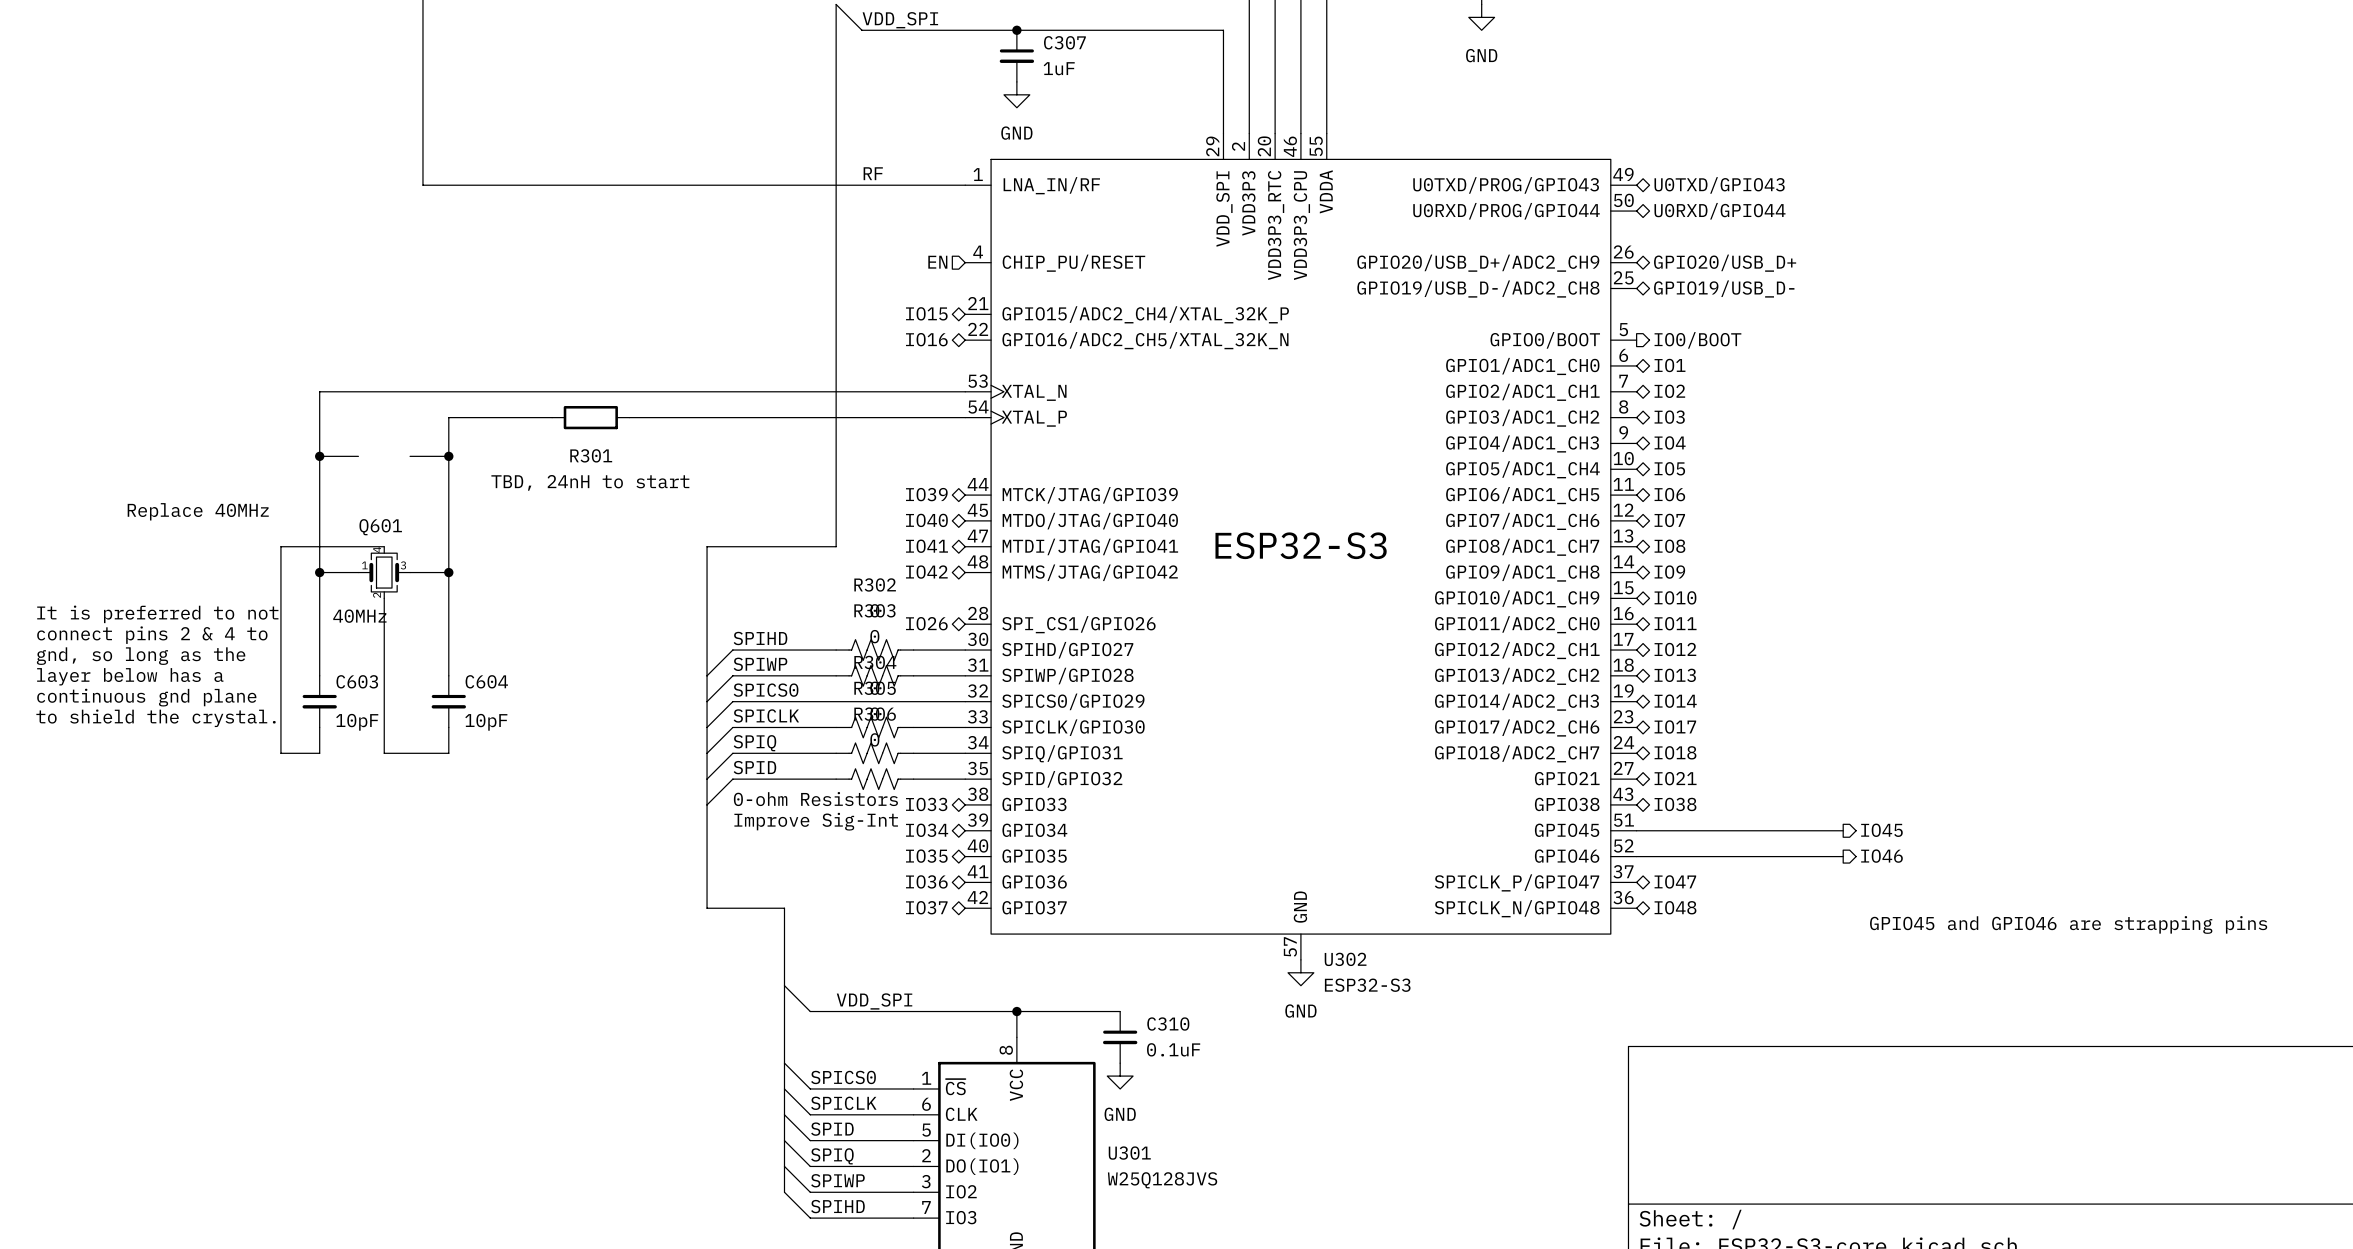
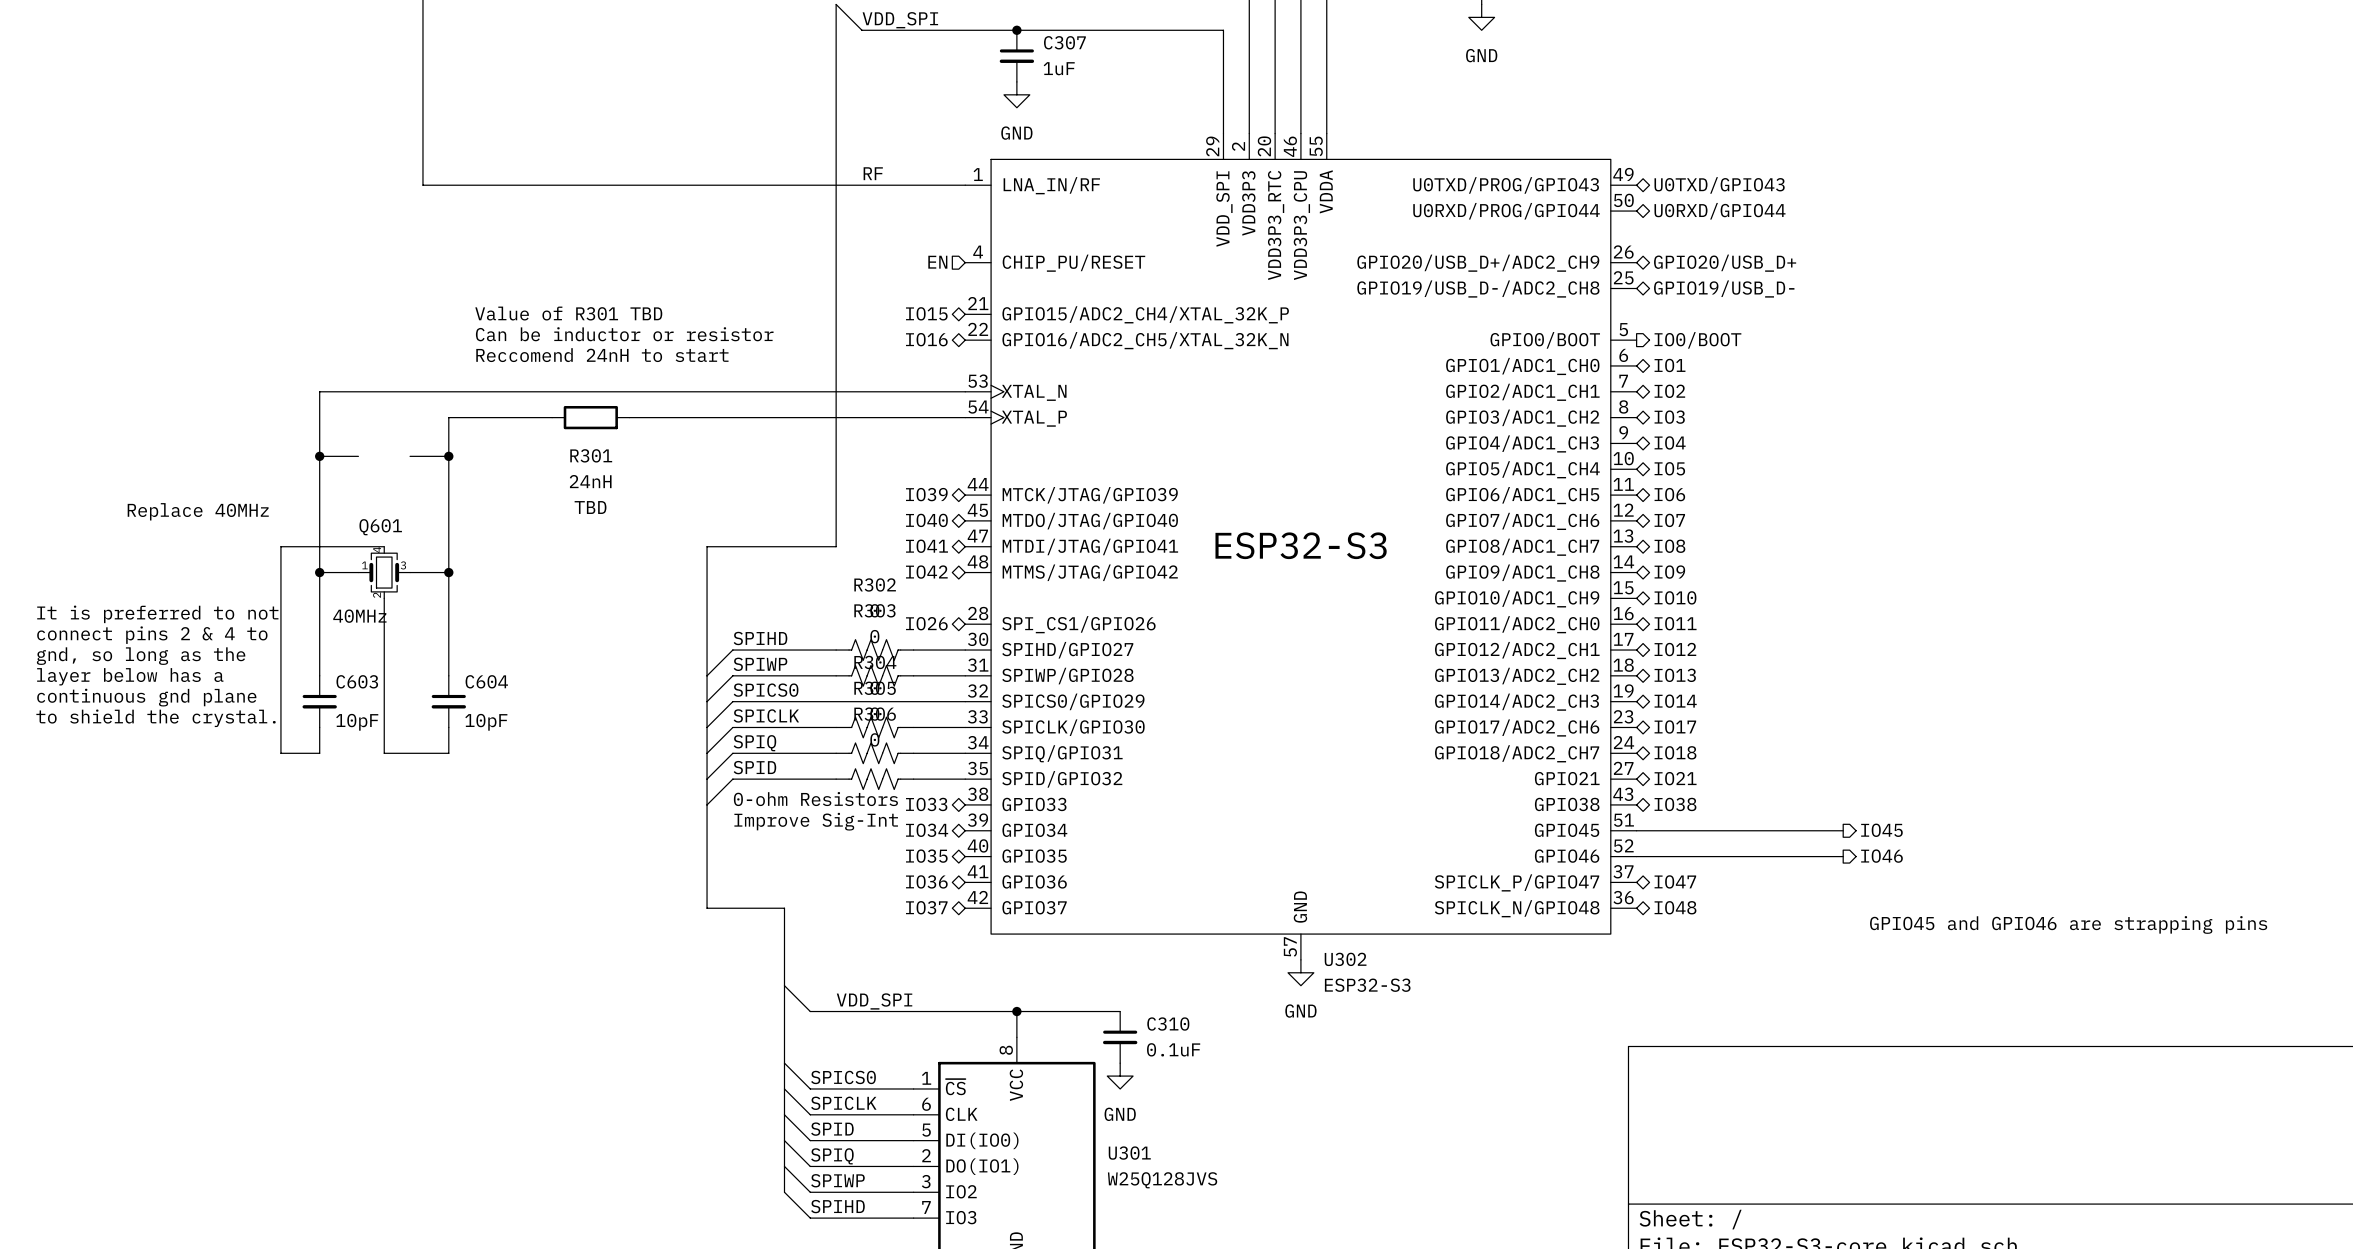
text: none -> Value of R301 TBD (568, 313)
text: none -> Can be inductor or resistor (624, 334)
text: none -> Reccomend 24nH to start (602, 355)
R301 value: TBD, 24nH to start (590, 482) -> 24nH (590, 481)
R301 text: none -> TBD (590, 507)

